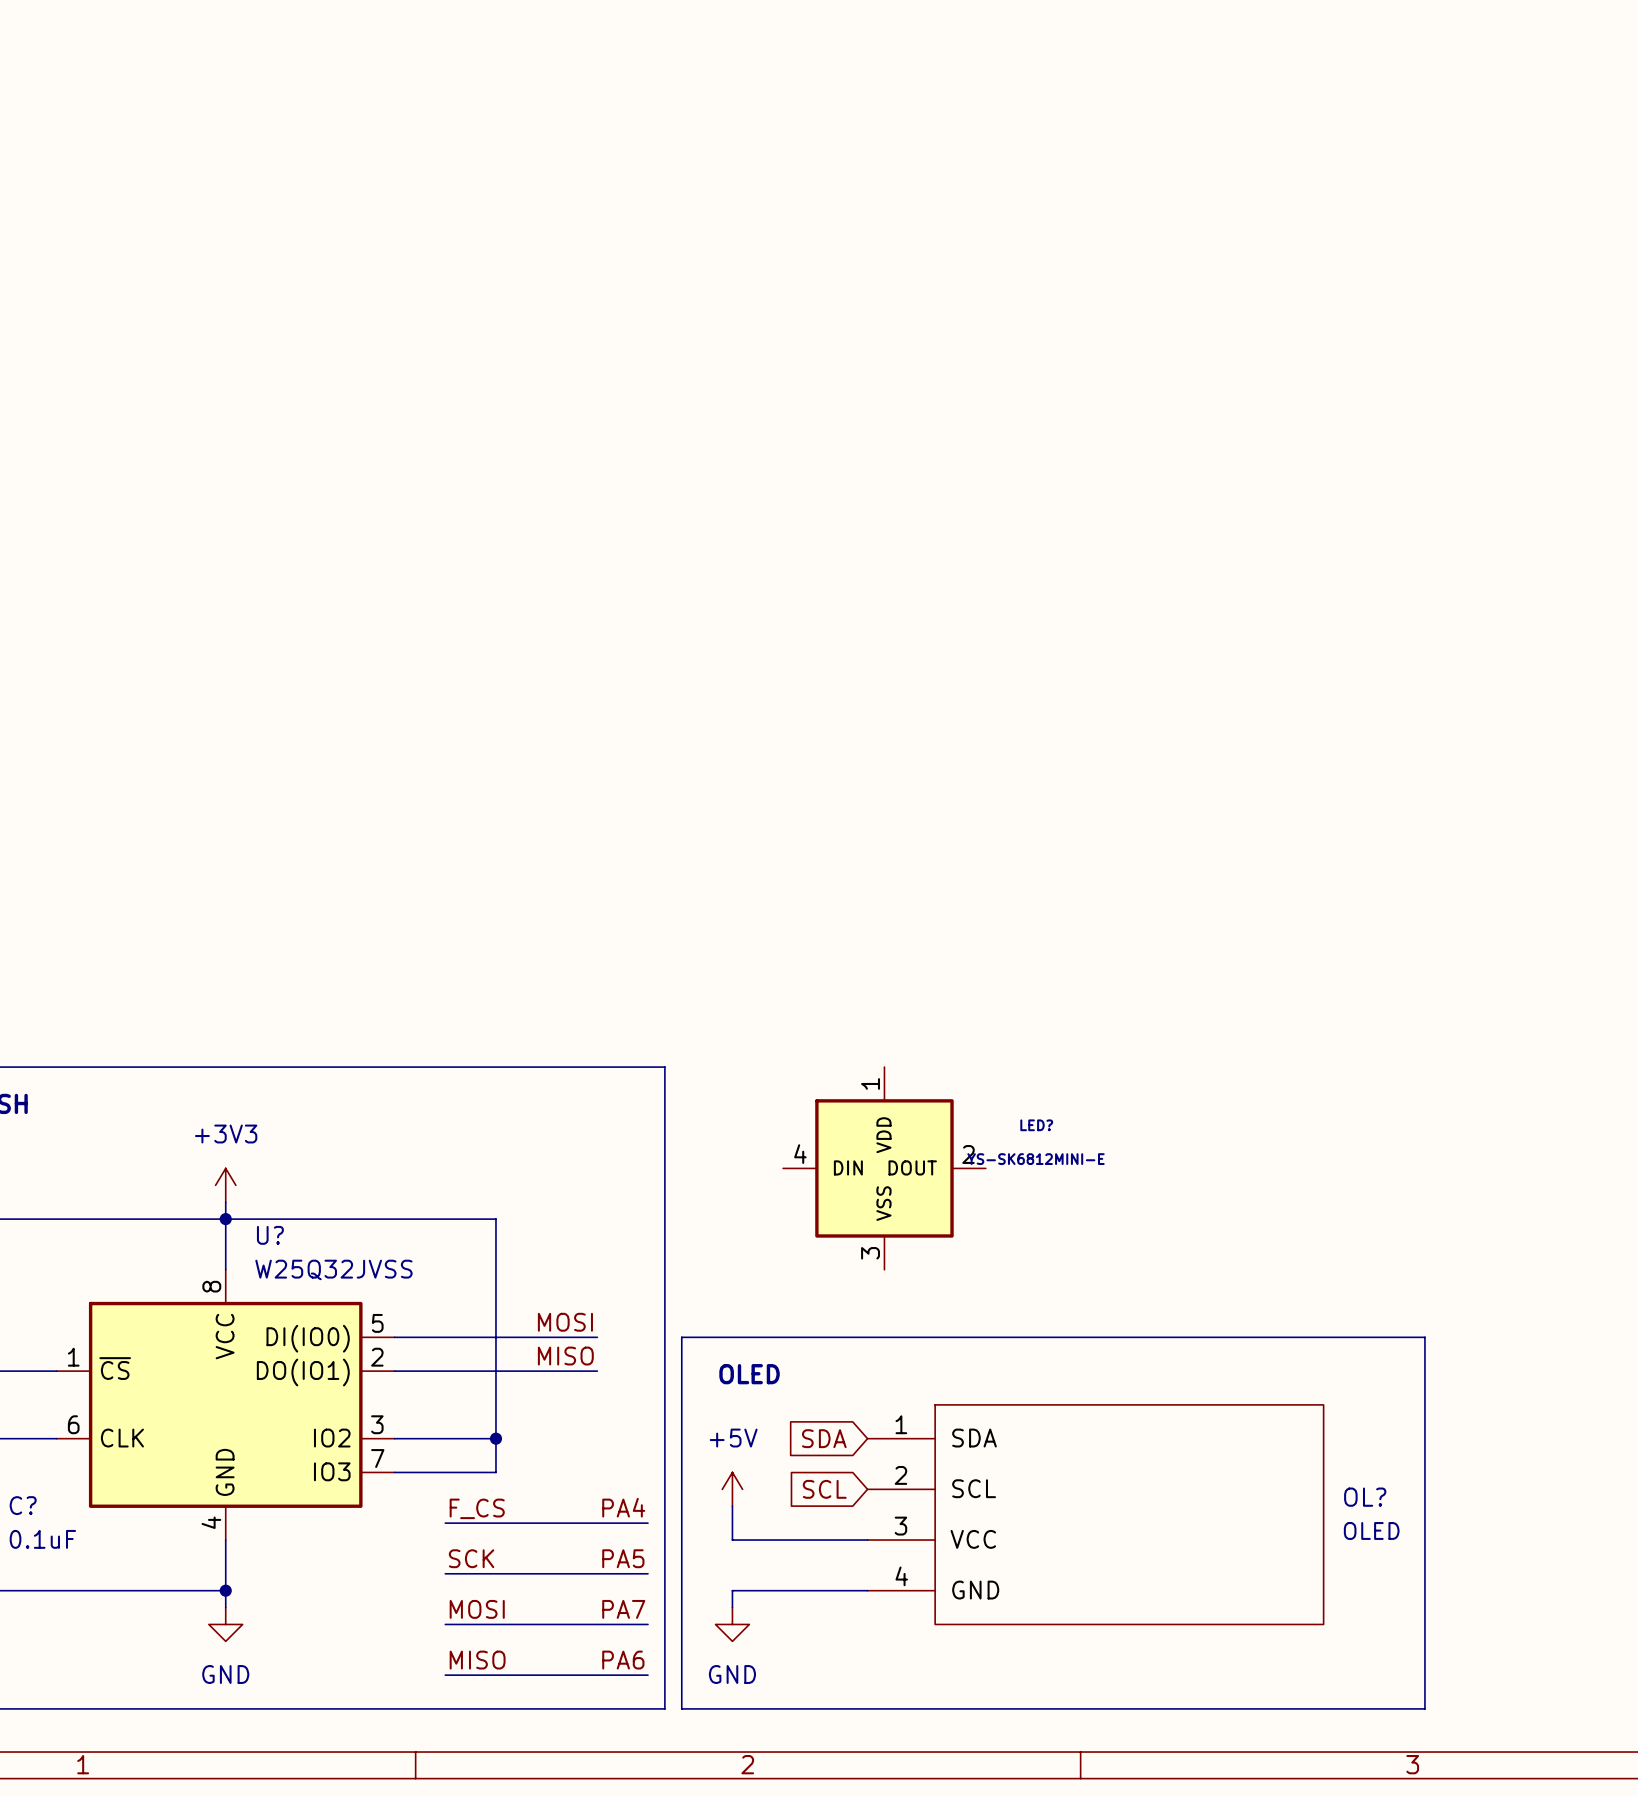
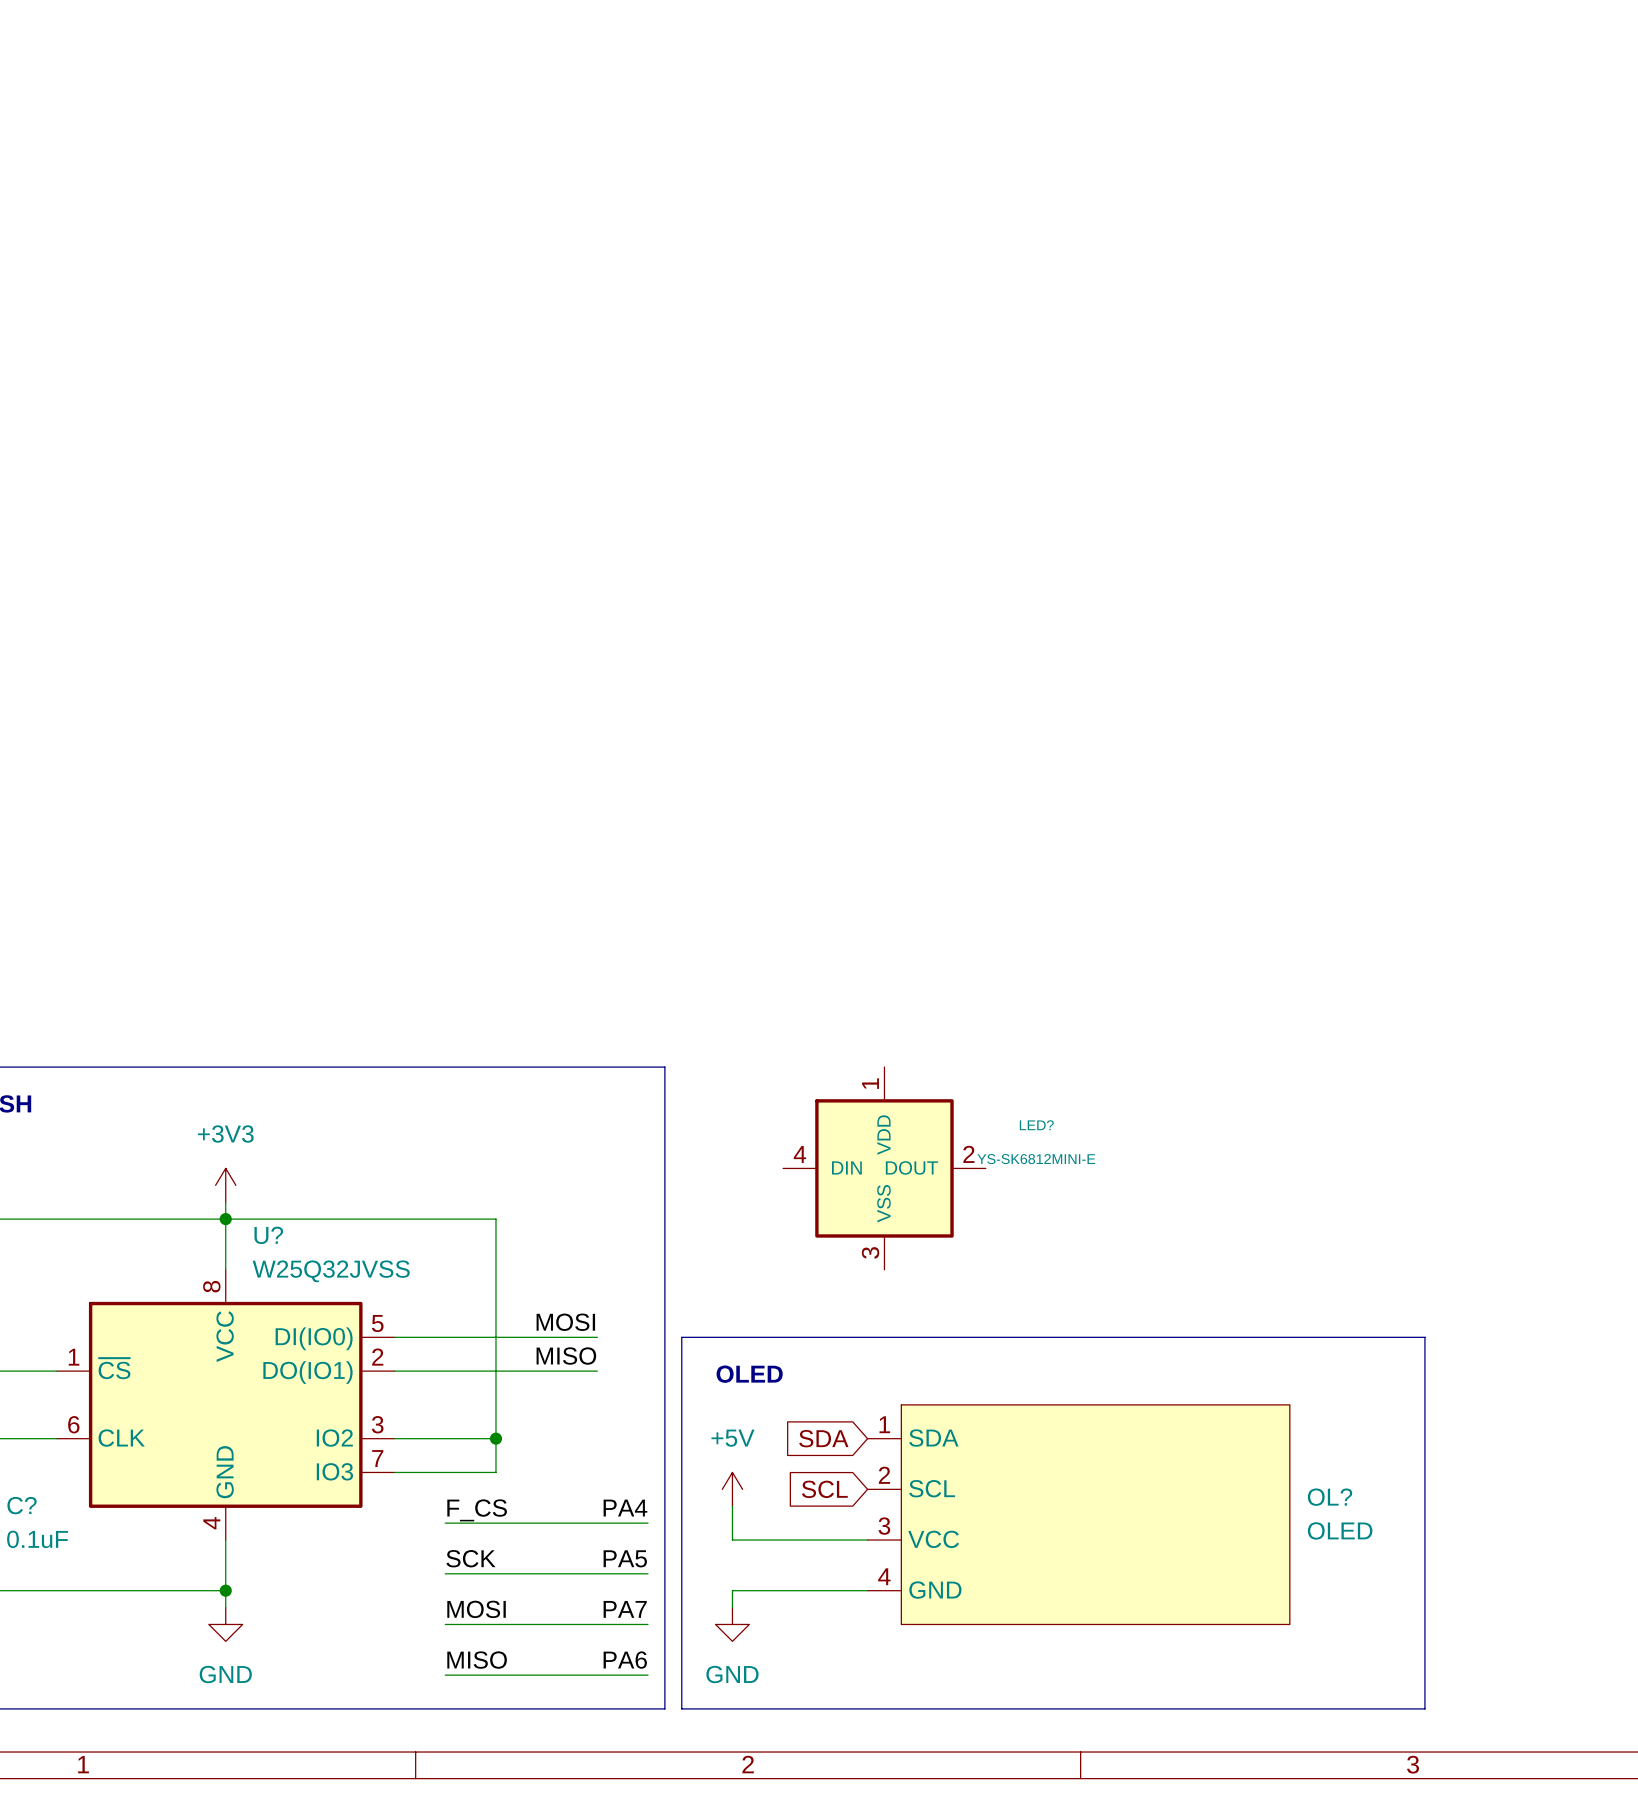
OL?: none -> OLED (1078, 1514)
OL?: OLED (1095, 1514) -> none

